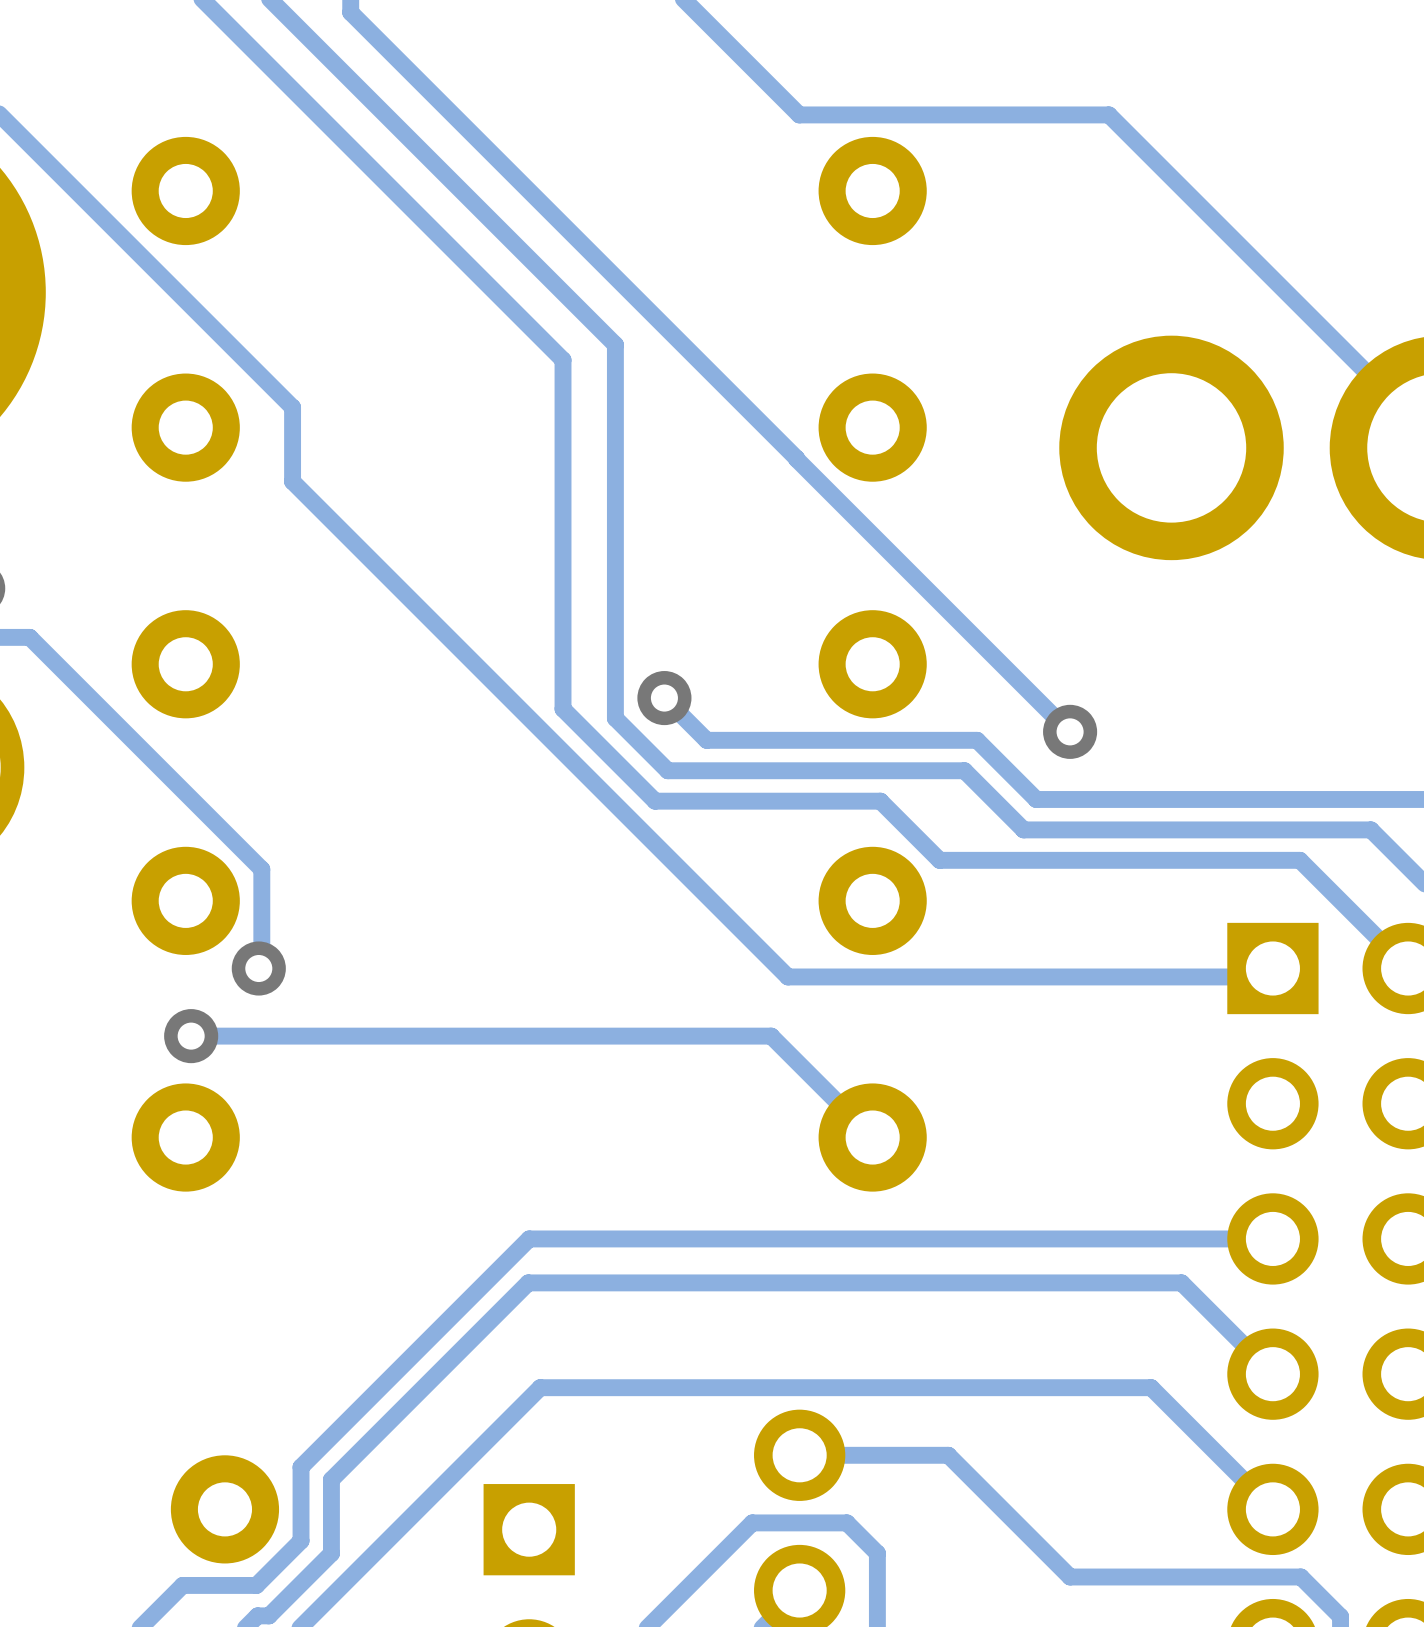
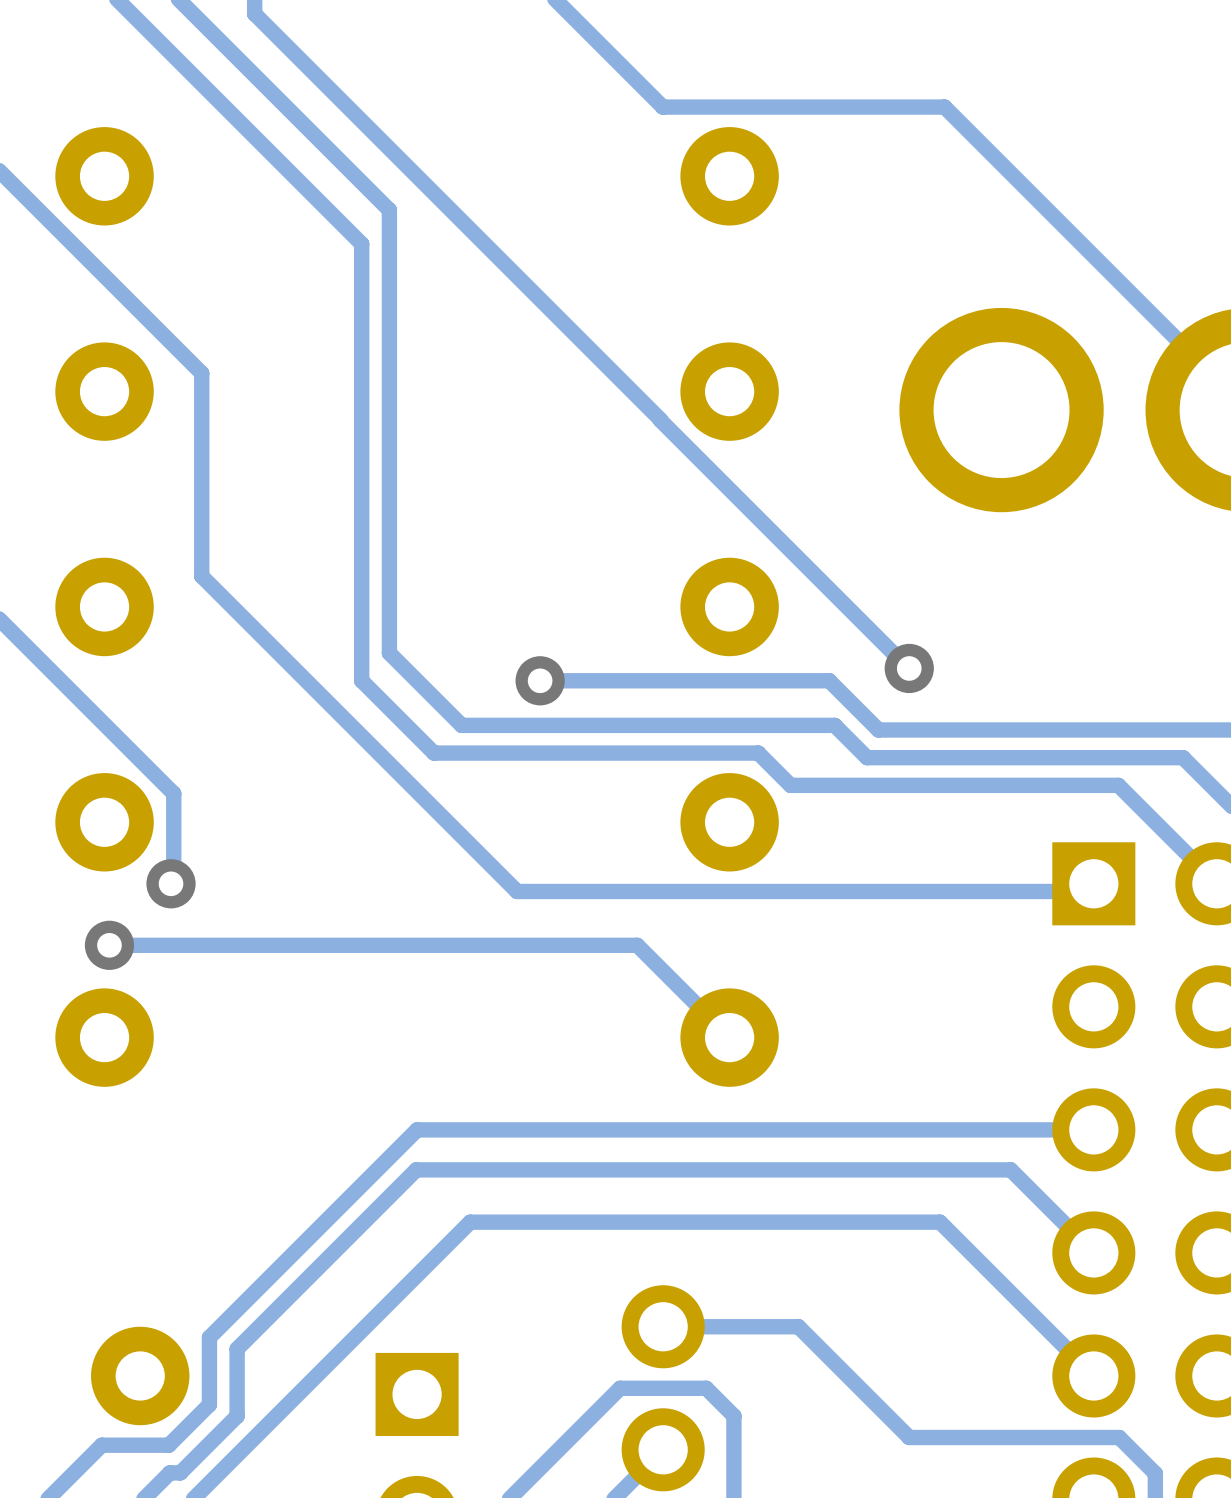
track: (498, 228) (615, 344) (615, 718) (667, 770) (964, 770) (988, 794) -> (389, 210) (389, 653) (461, 725) (834, 725)
track: (468, 265) (563, 360) (563, 709) (655, 801) (880, 801) (904, 824) -> (361, 243) (361, 680) (434, 753) (758, 753)
track: (292, 481) (787, 976) -> (201, 440) (201, 576) (517, 891) (652, 891)
track: (664, 698) (706, 740) (977, 740) (982, 745) -> (540, 680) (829, 680)
via position: (664, 698) -> (540, 680)
track: (1151, 1387) (540, 1387) -> (983, 1265) (940, 1222) (470, 1222) (427, 1265)

